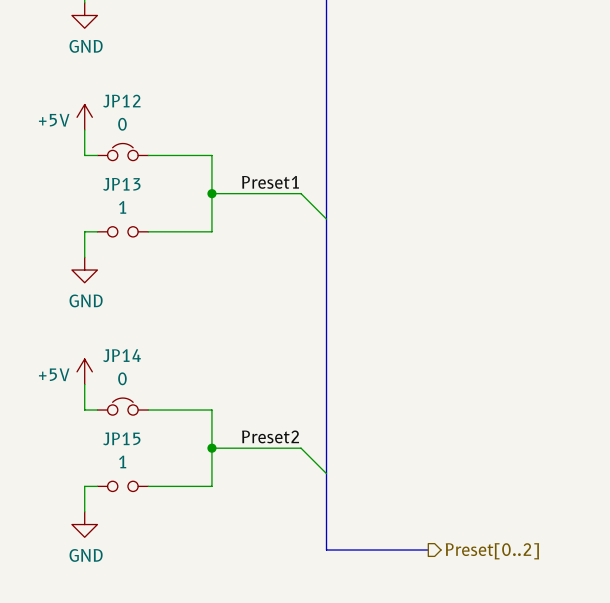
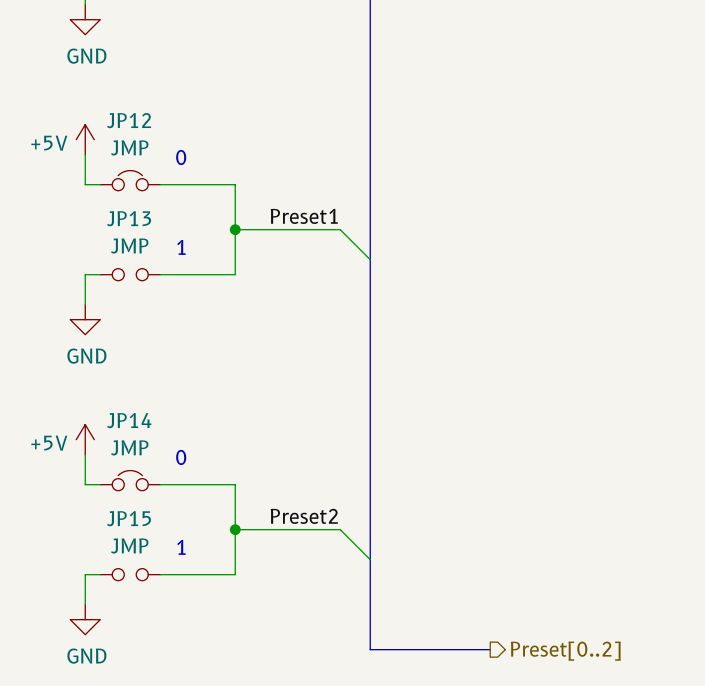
JP12 value: 0 (122, 124) -> JMP (129, 147)
text: none -> 0 (181, 157)
JP13 value: 1 (122, 207) -> JMP (129, 246)
text: none -> 1 (181, 247)
JP14 value: 0 (122, 378) -> JMP (129, 447)
text: none -> 0 (181, 457)
JP15 value: 1 (122, 461) -> JMP (129, 545)
text: none -> 1 (181, 547)

